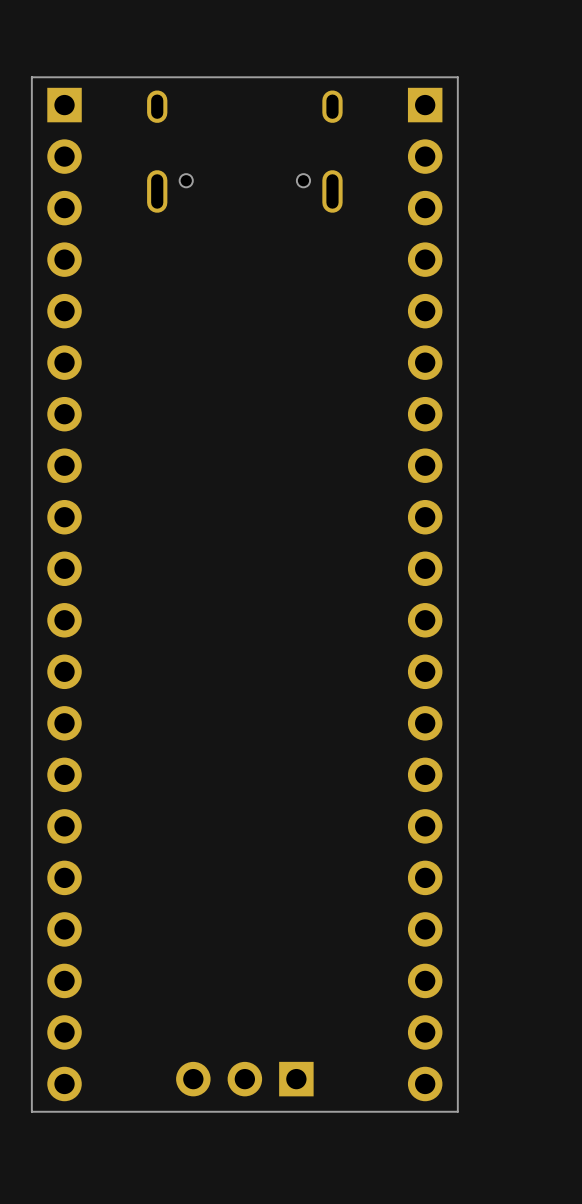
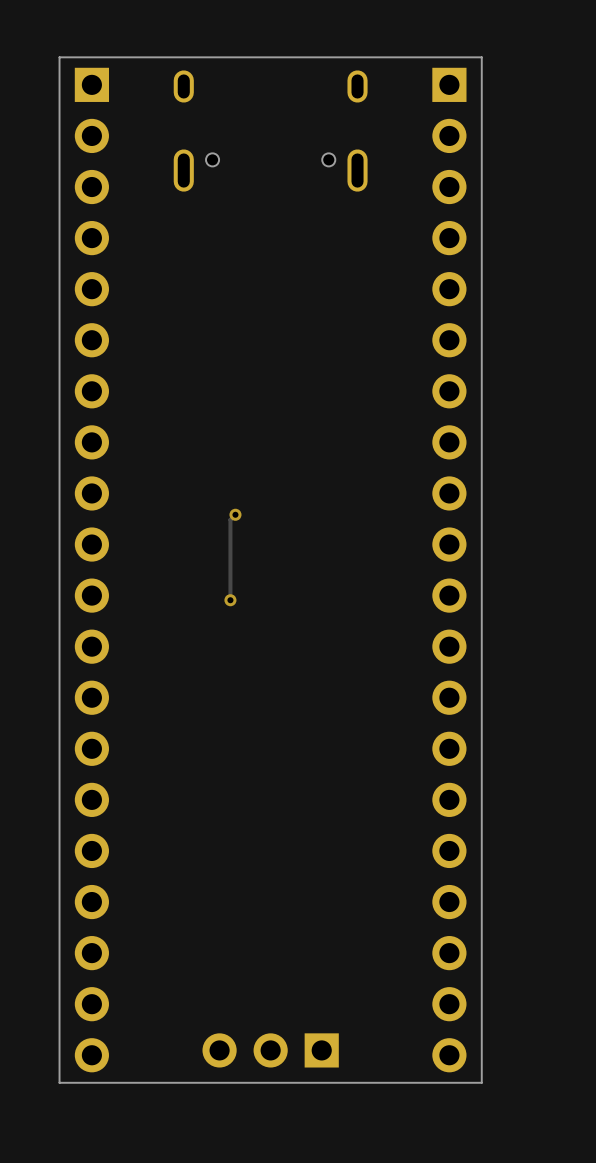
track: none -> (235, 514) (230, 519) (230, 600)
via: none -> (235, 514)
via: none -> (230, 600)

